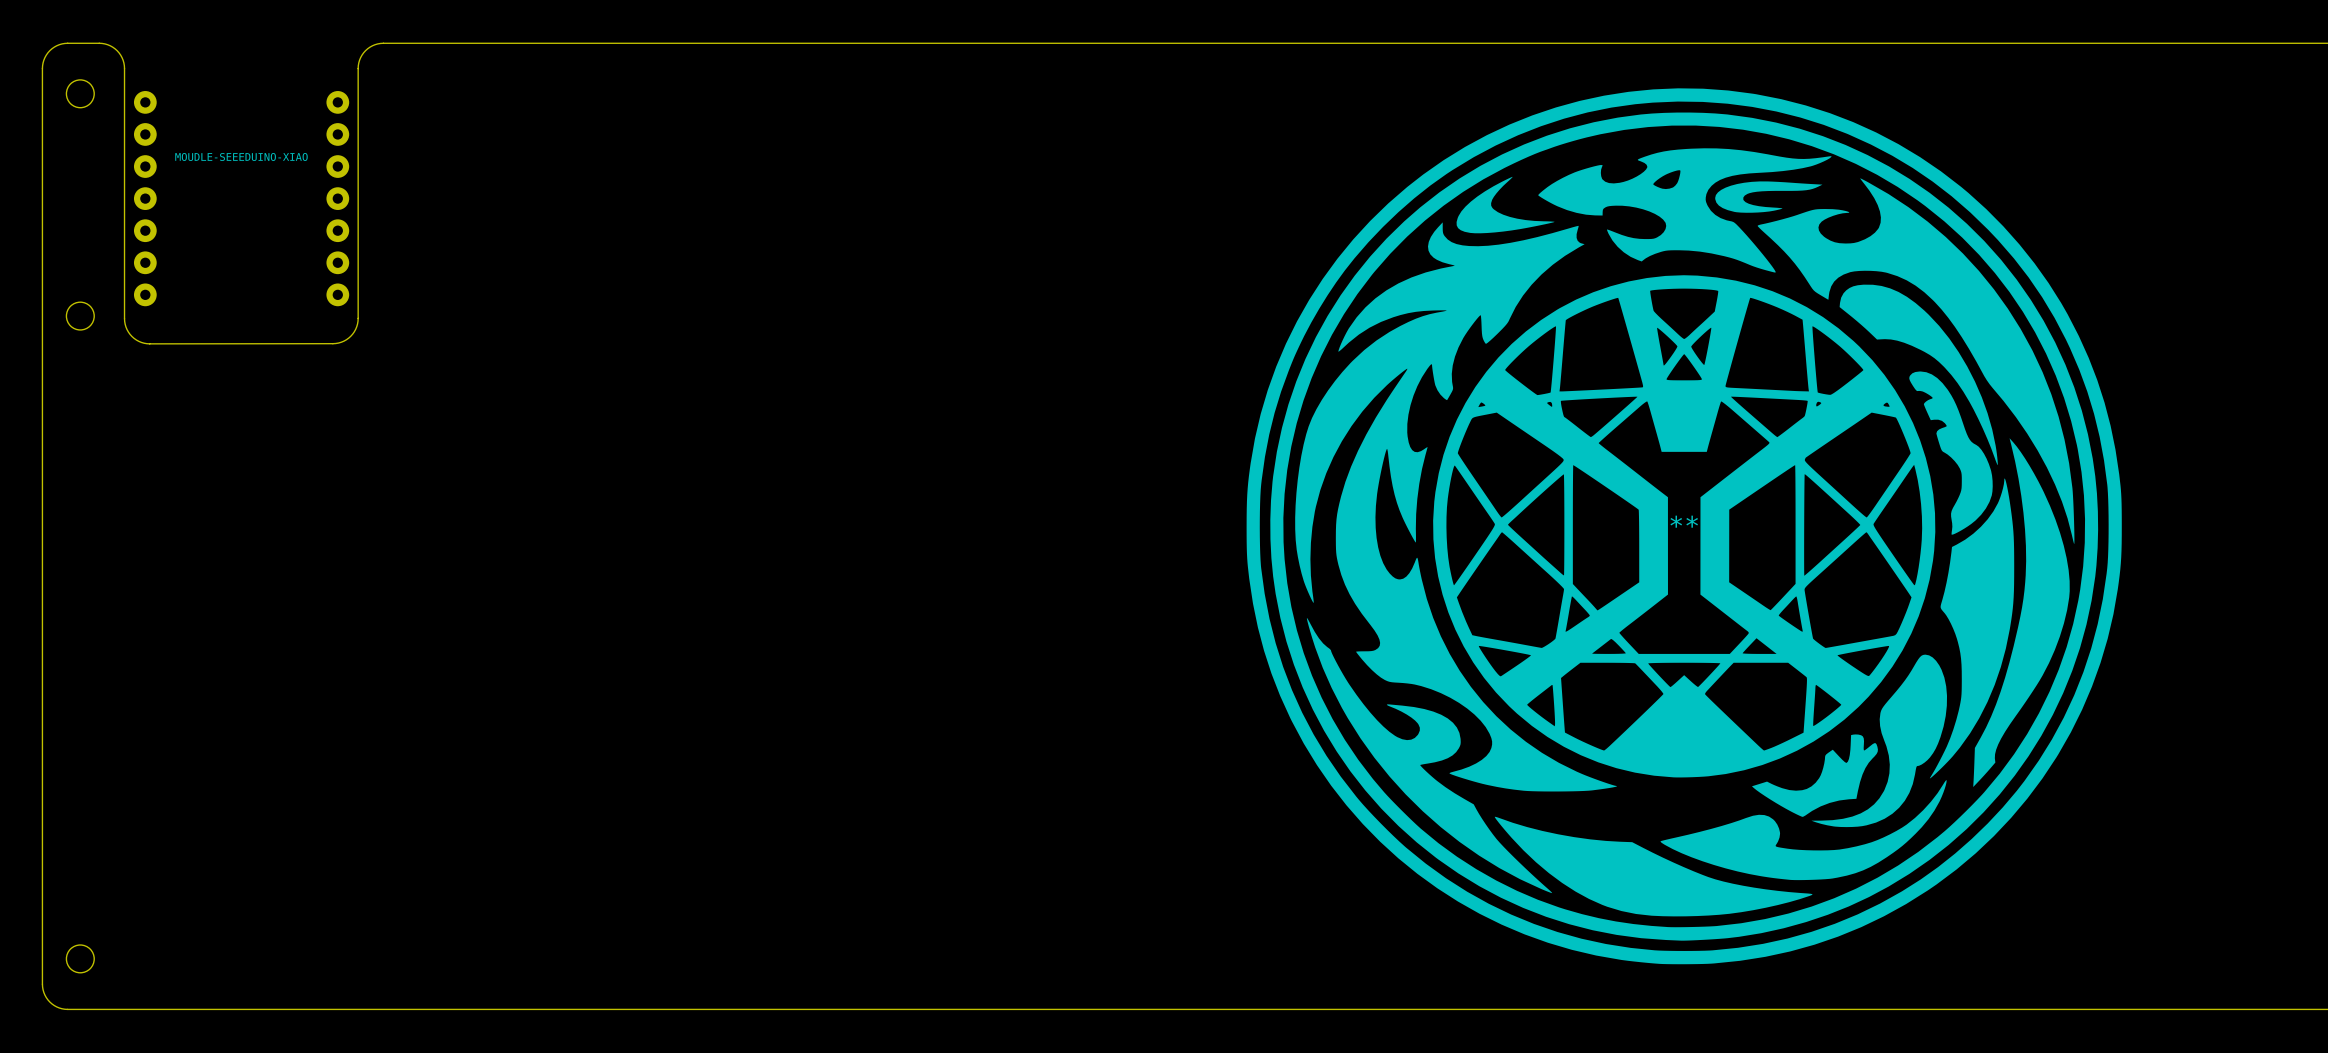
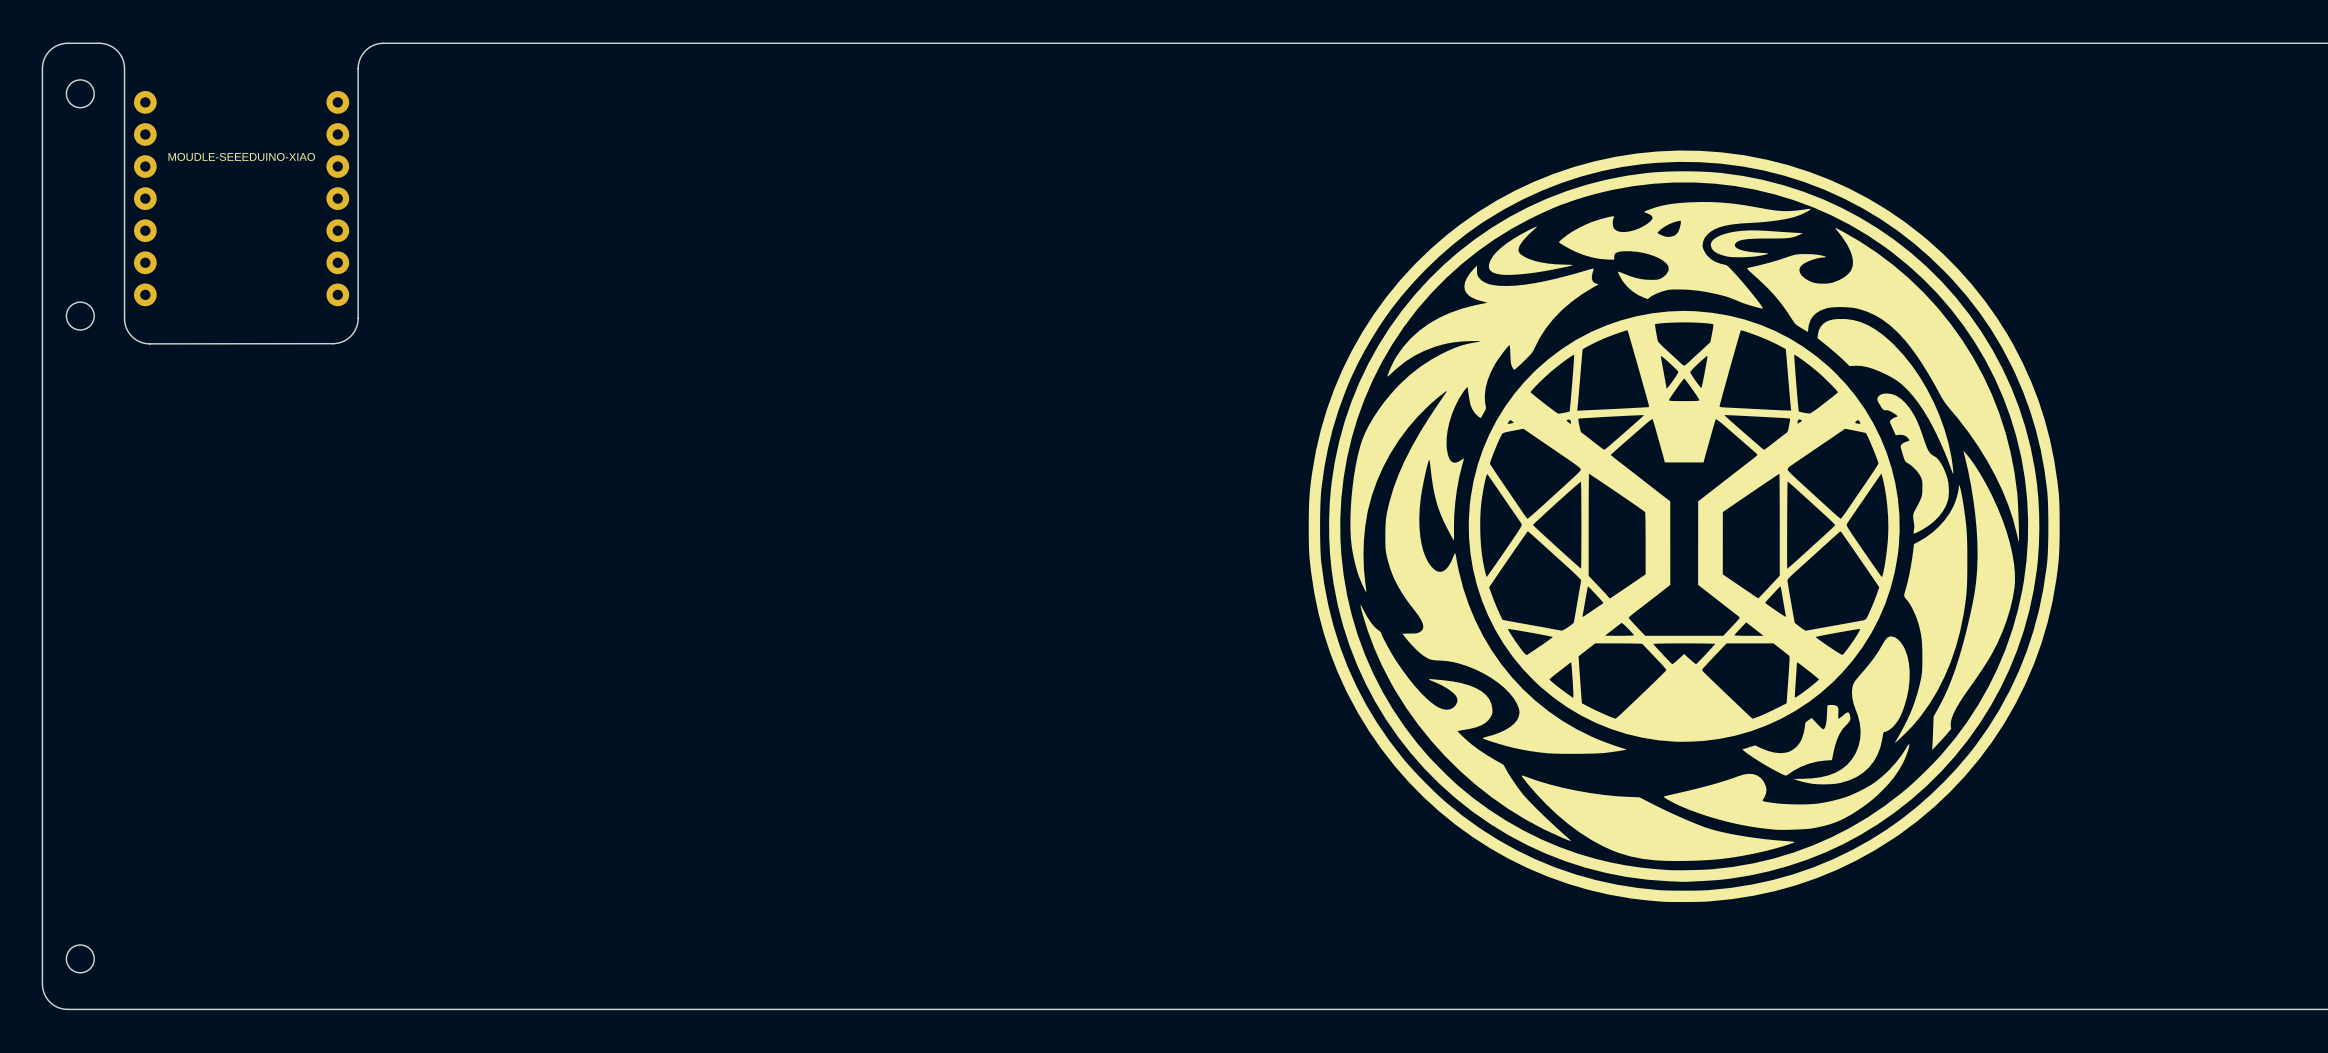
drawing: none -> [1308, 150, 2060, 903]
part: (1684, 526) -> none

